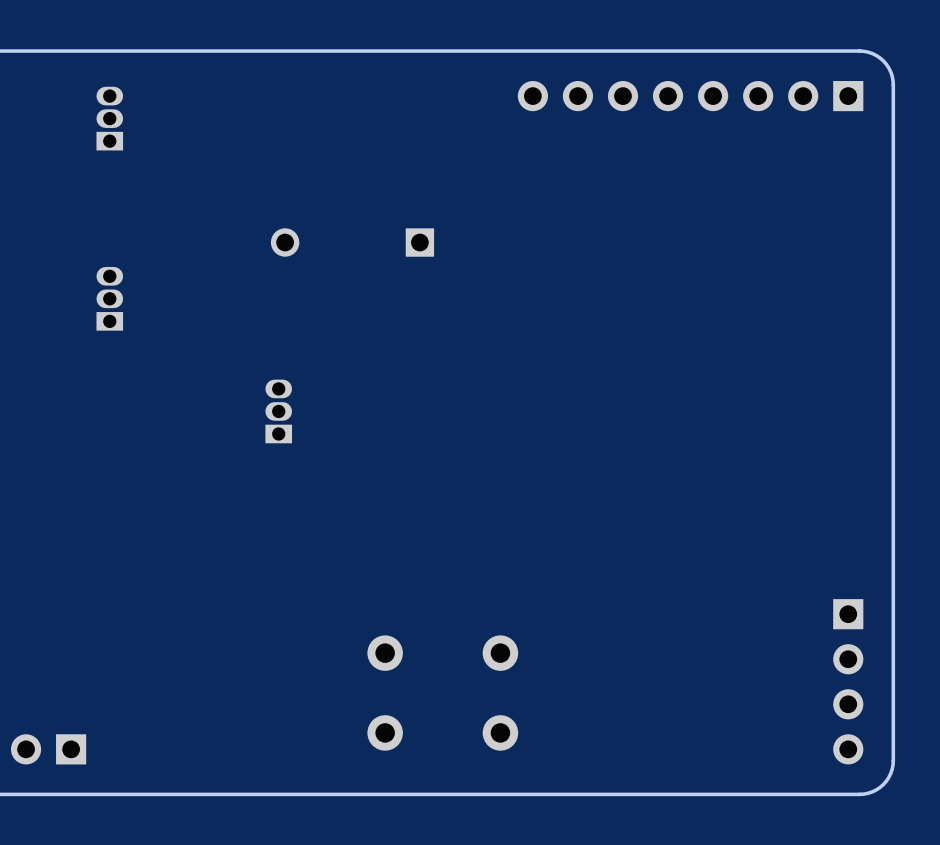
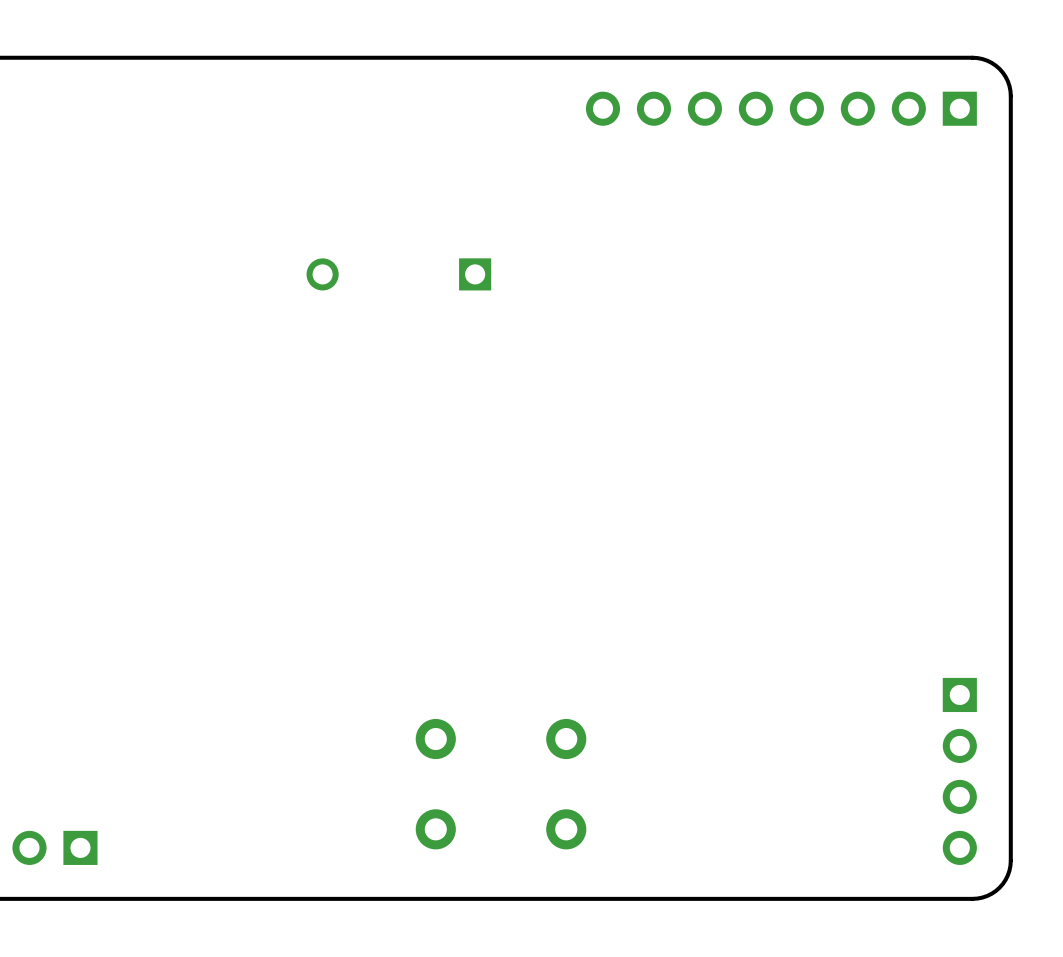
part: (109, 118) -> none
part: (109, 298) -> none
part: (278, 411) -> none

